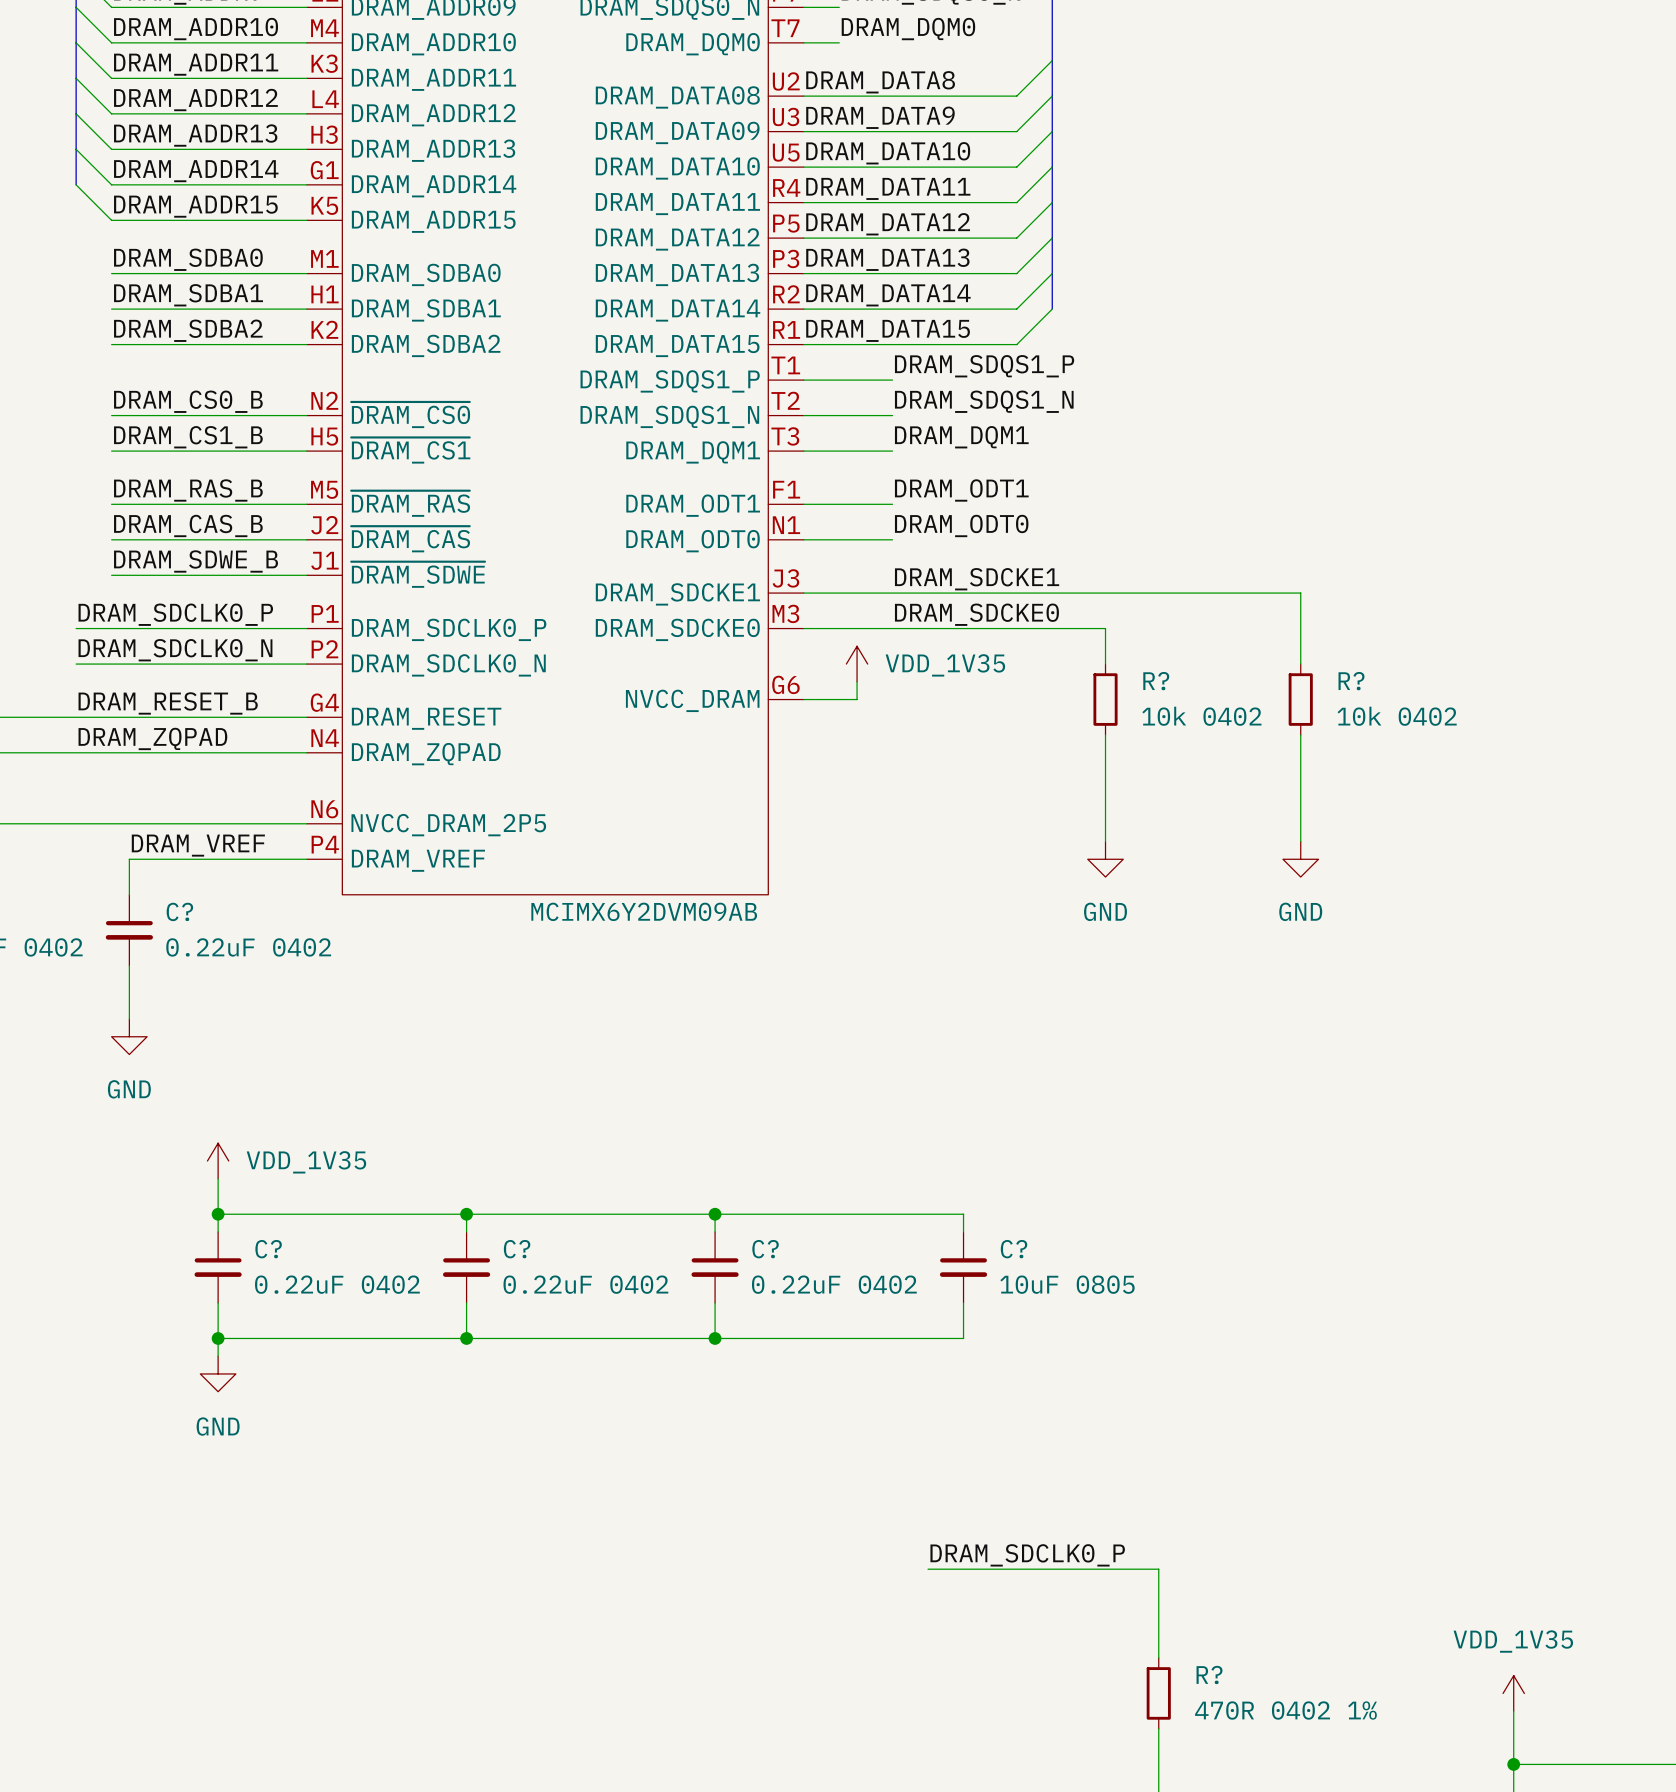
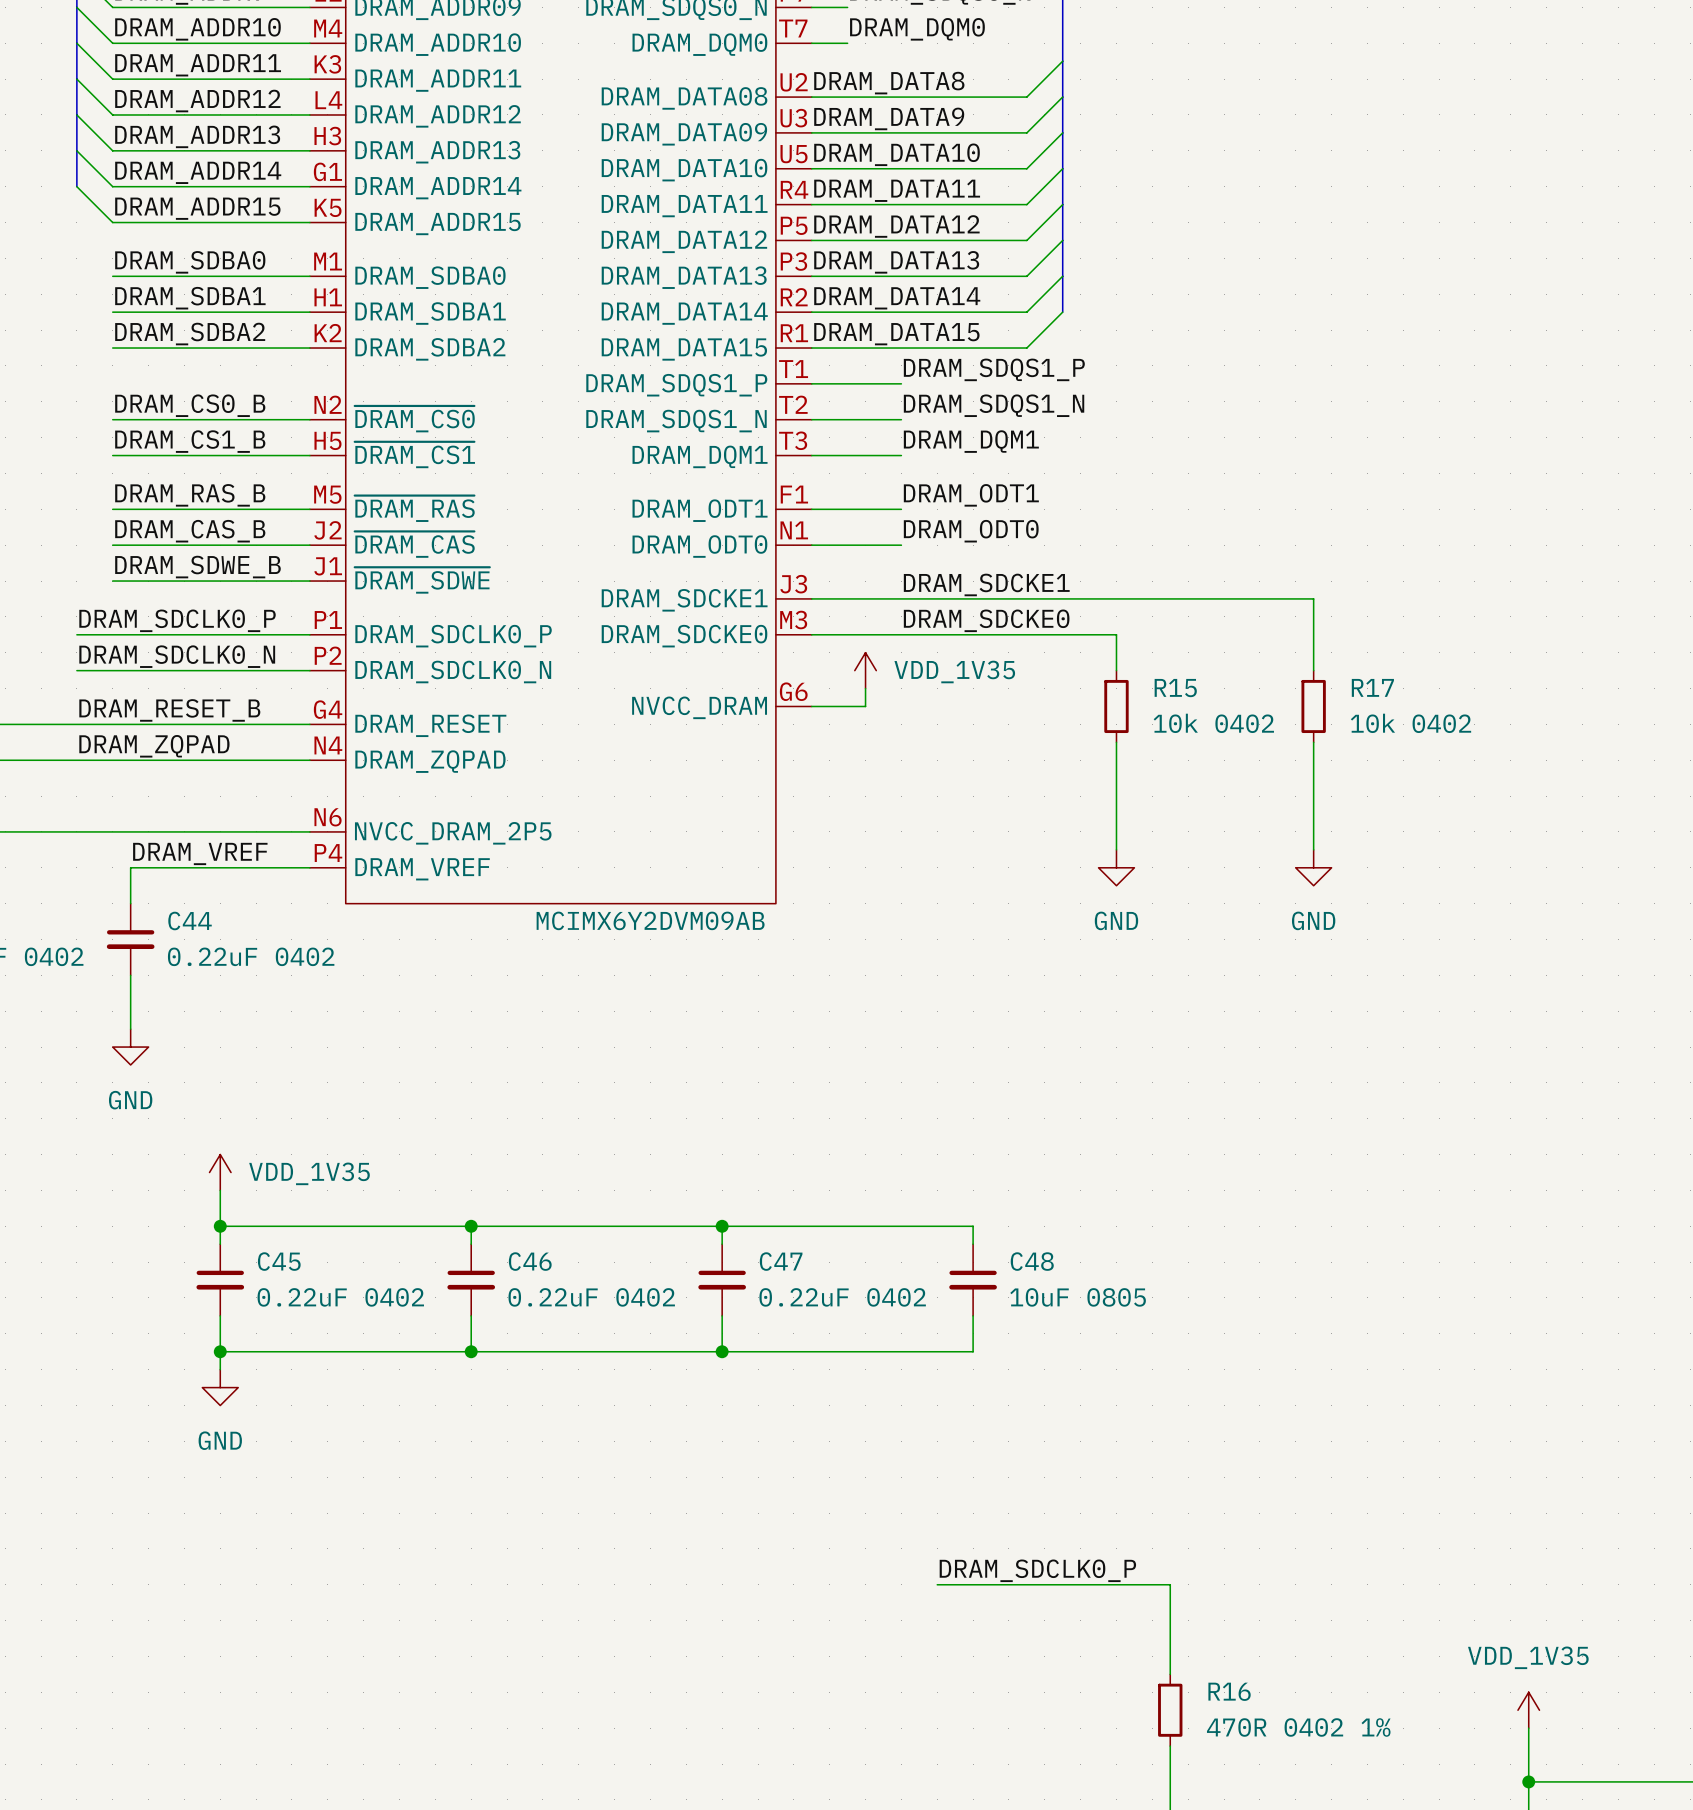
R? name: R? (1156, 681) -> R15 (1175, 688)
R? name: R? (1351, 681) -> R17 (1372, 687)
C? name: C? (179, 911) -> C44 (190, 920)
C? name: C? (268, 1249) -> C45 (279, 1261)
C? name: C? (517, 1249) -> C46 (530, 1261)
C? name: C? (765, 1249) -> C47 (781, 1261)
C? name: C? (1014, 1249) -> C48 (1032, 1261)
R? name: R? (1209, 1674) -> R16 (1229, 1691)

